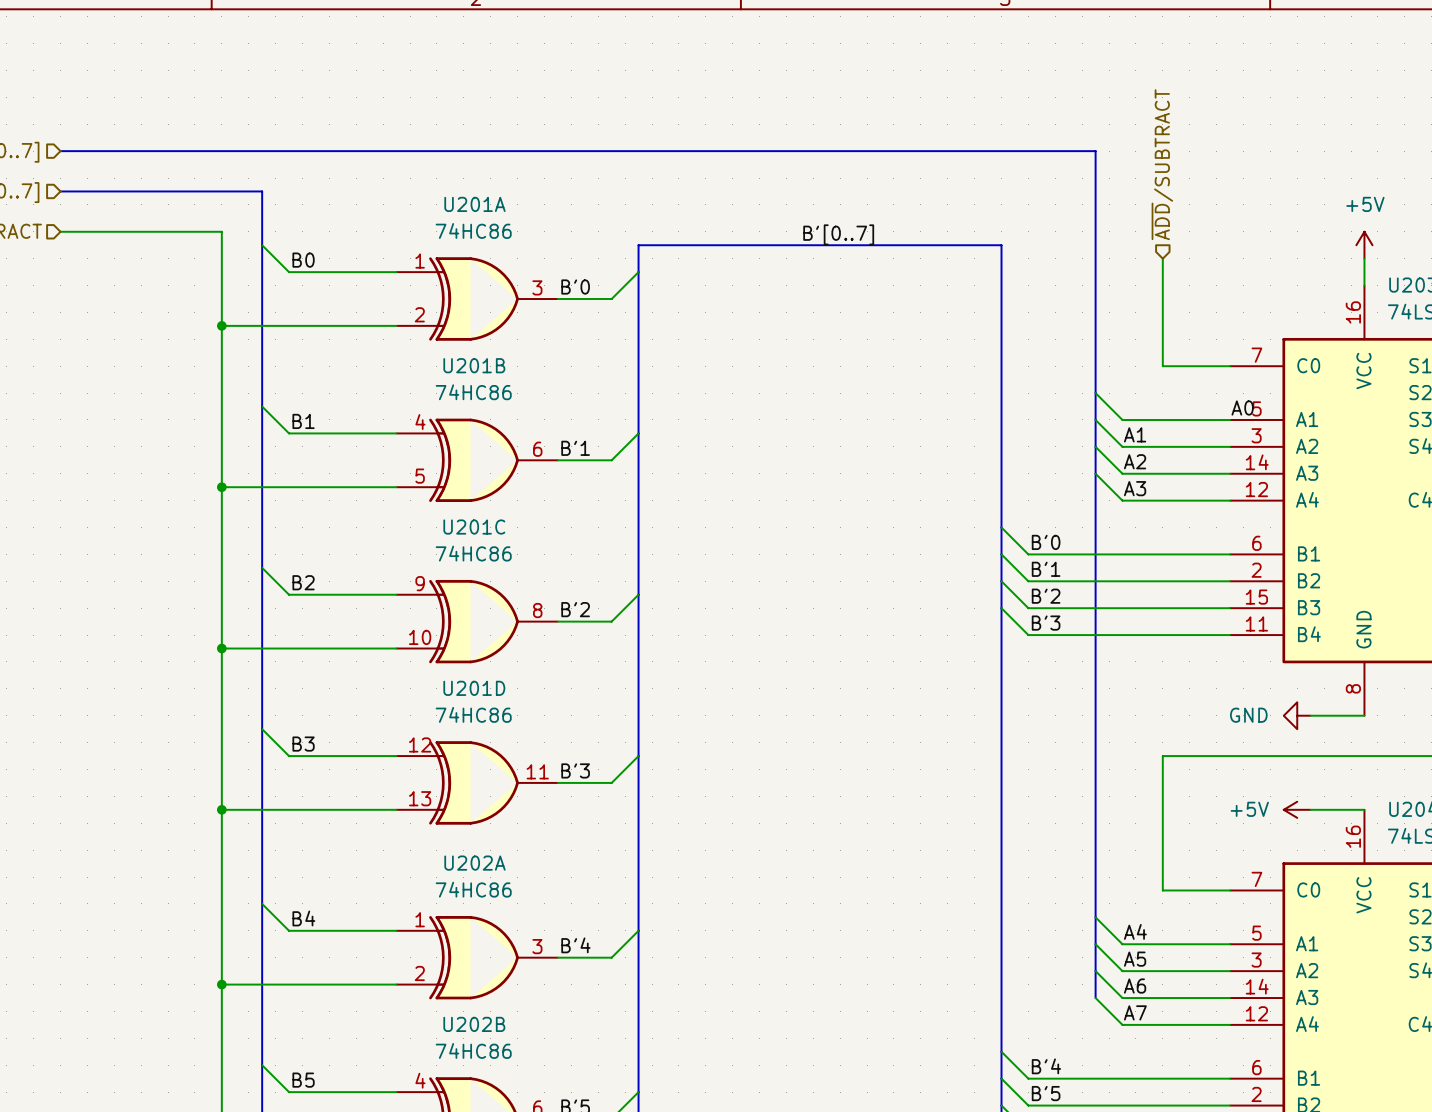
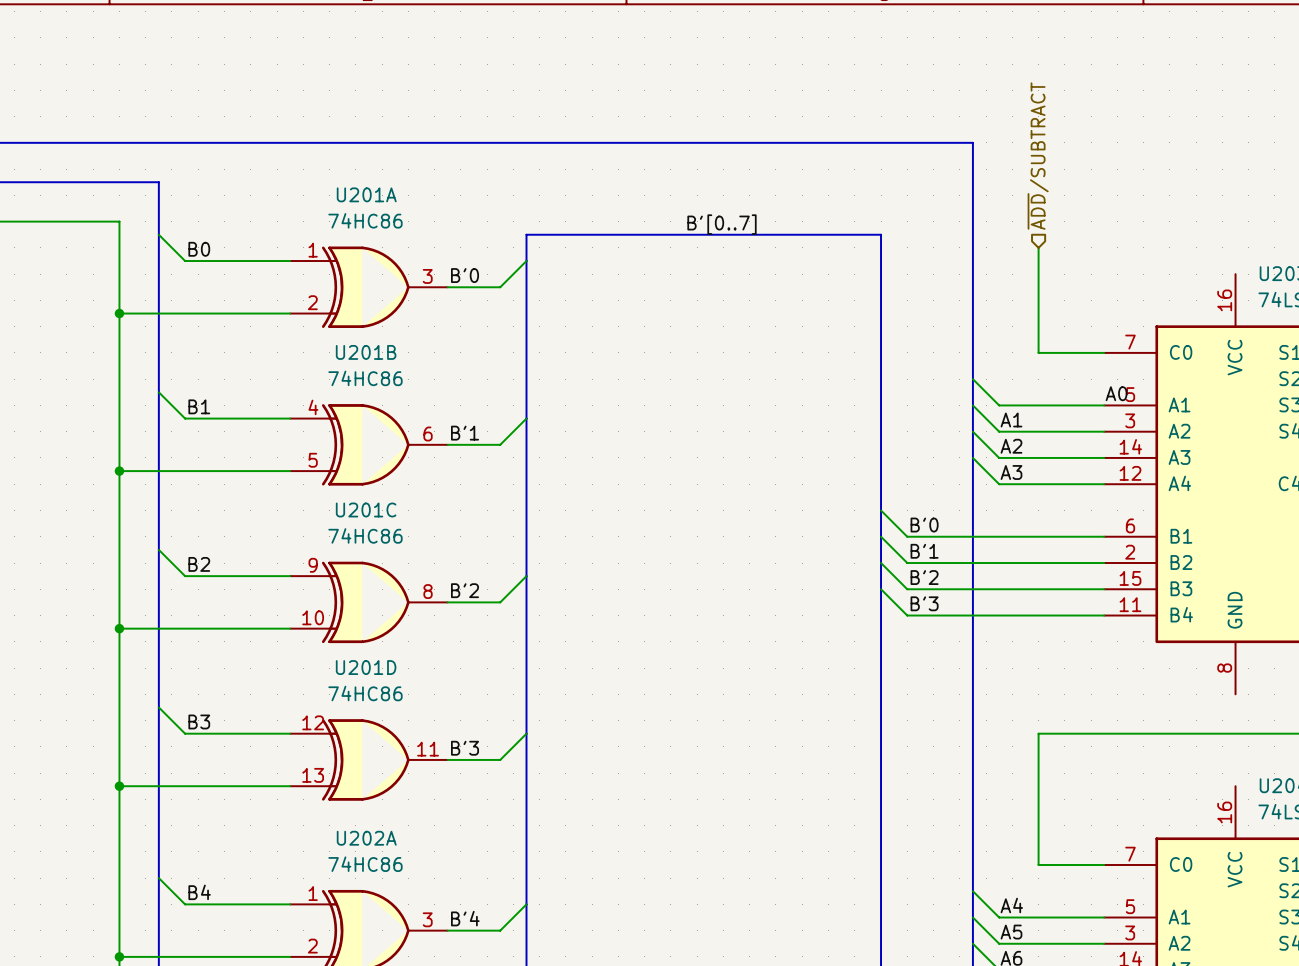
power symbol: +5V (1364, 245) -> none
wire: (1364, 258) (1364, 285) -> none
power symbol: GND (1297, 715) -> none
wire: (1310, 715) (1364, 715) -> none
power symbol: +5V (1297, 809) -> none
wire: (1310, 809) (1364, 809) -> none

